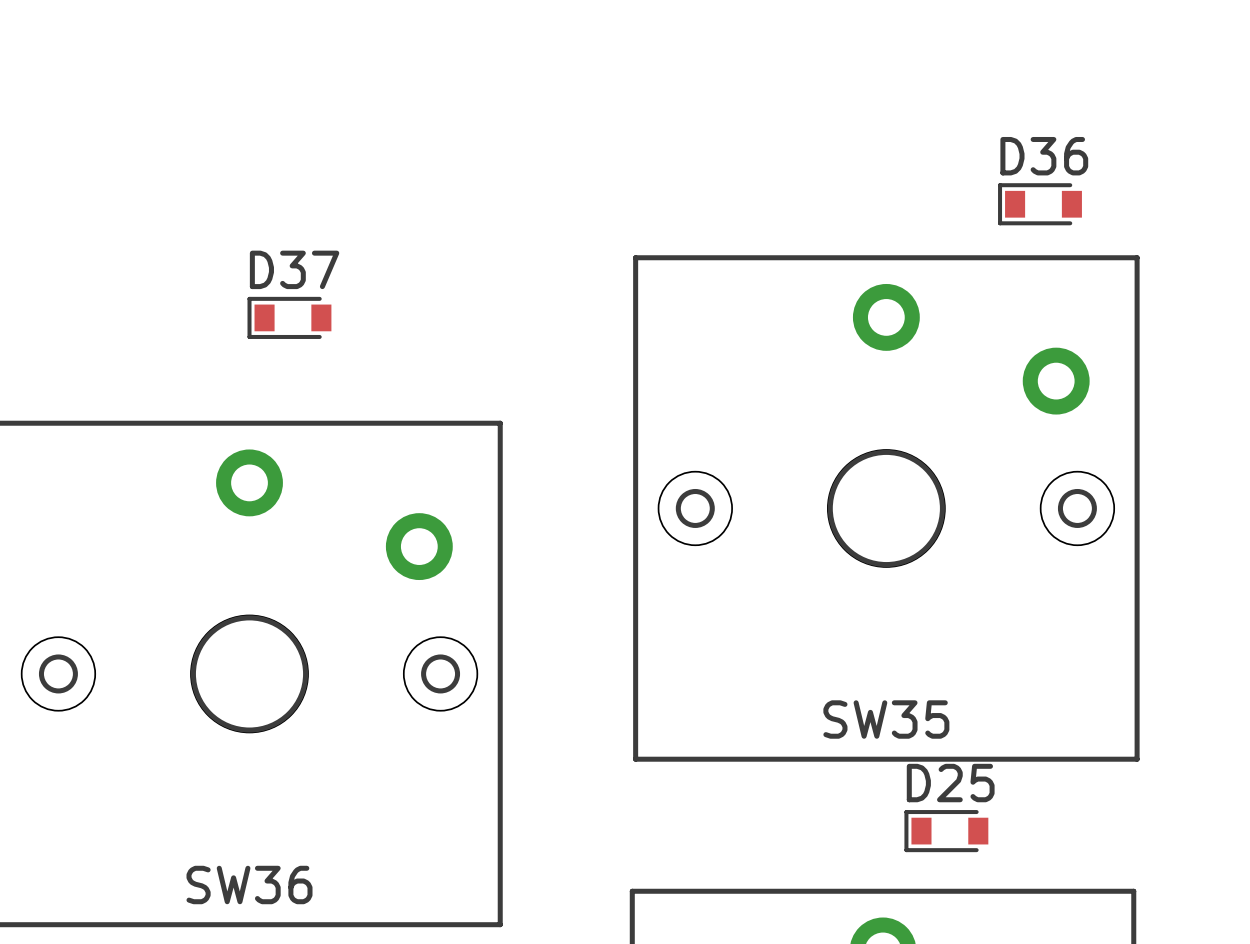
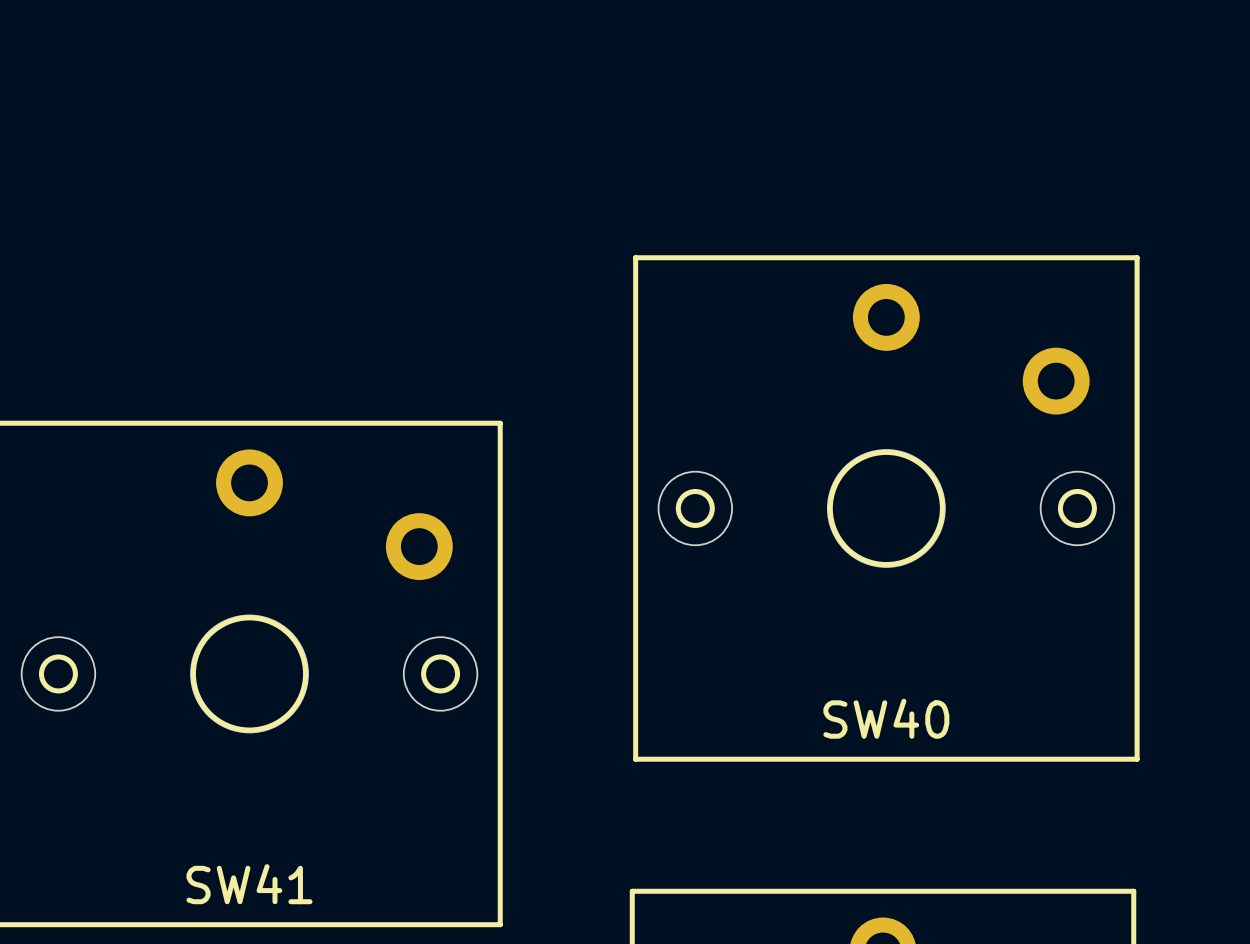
D36: (1039, 204) -> none
D37: (289, 317) -> none
SW35 name: SW35 (886, 719) -> SW40 (886, 718)
D25: (946, 831) -> none
SW36 name: SW36 (249, 885) -> SW41 (249, 884)

